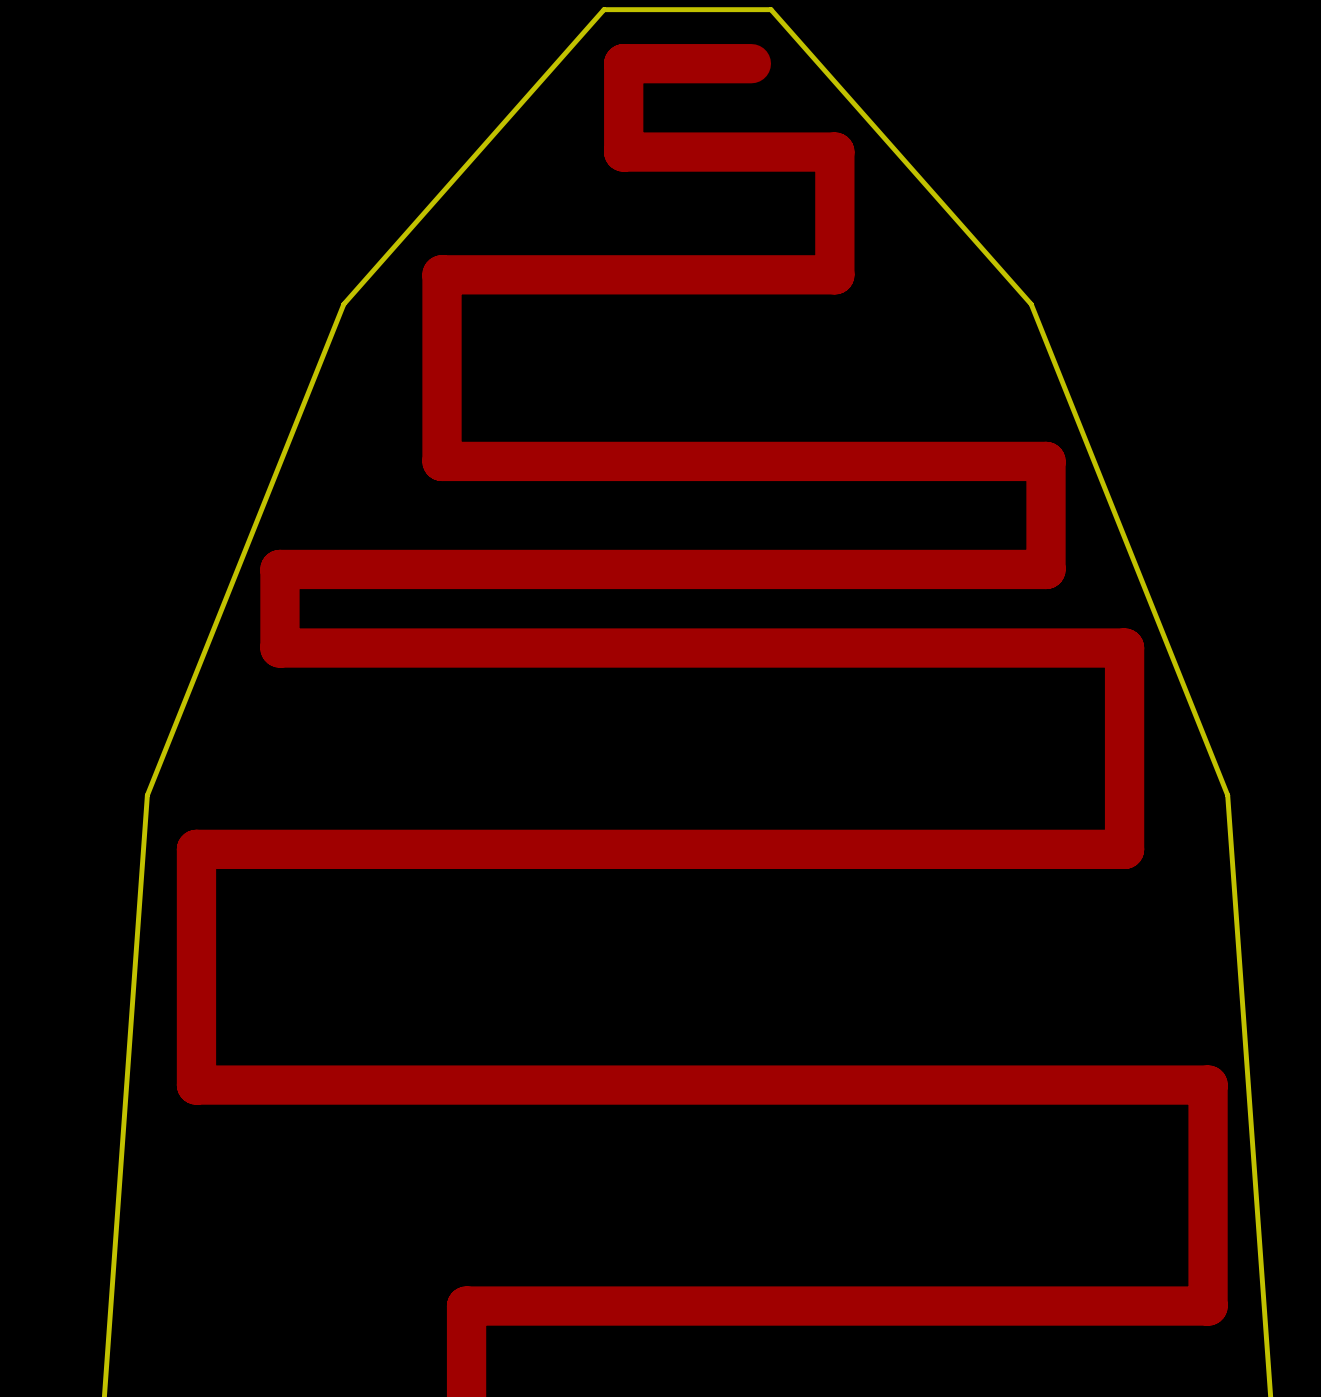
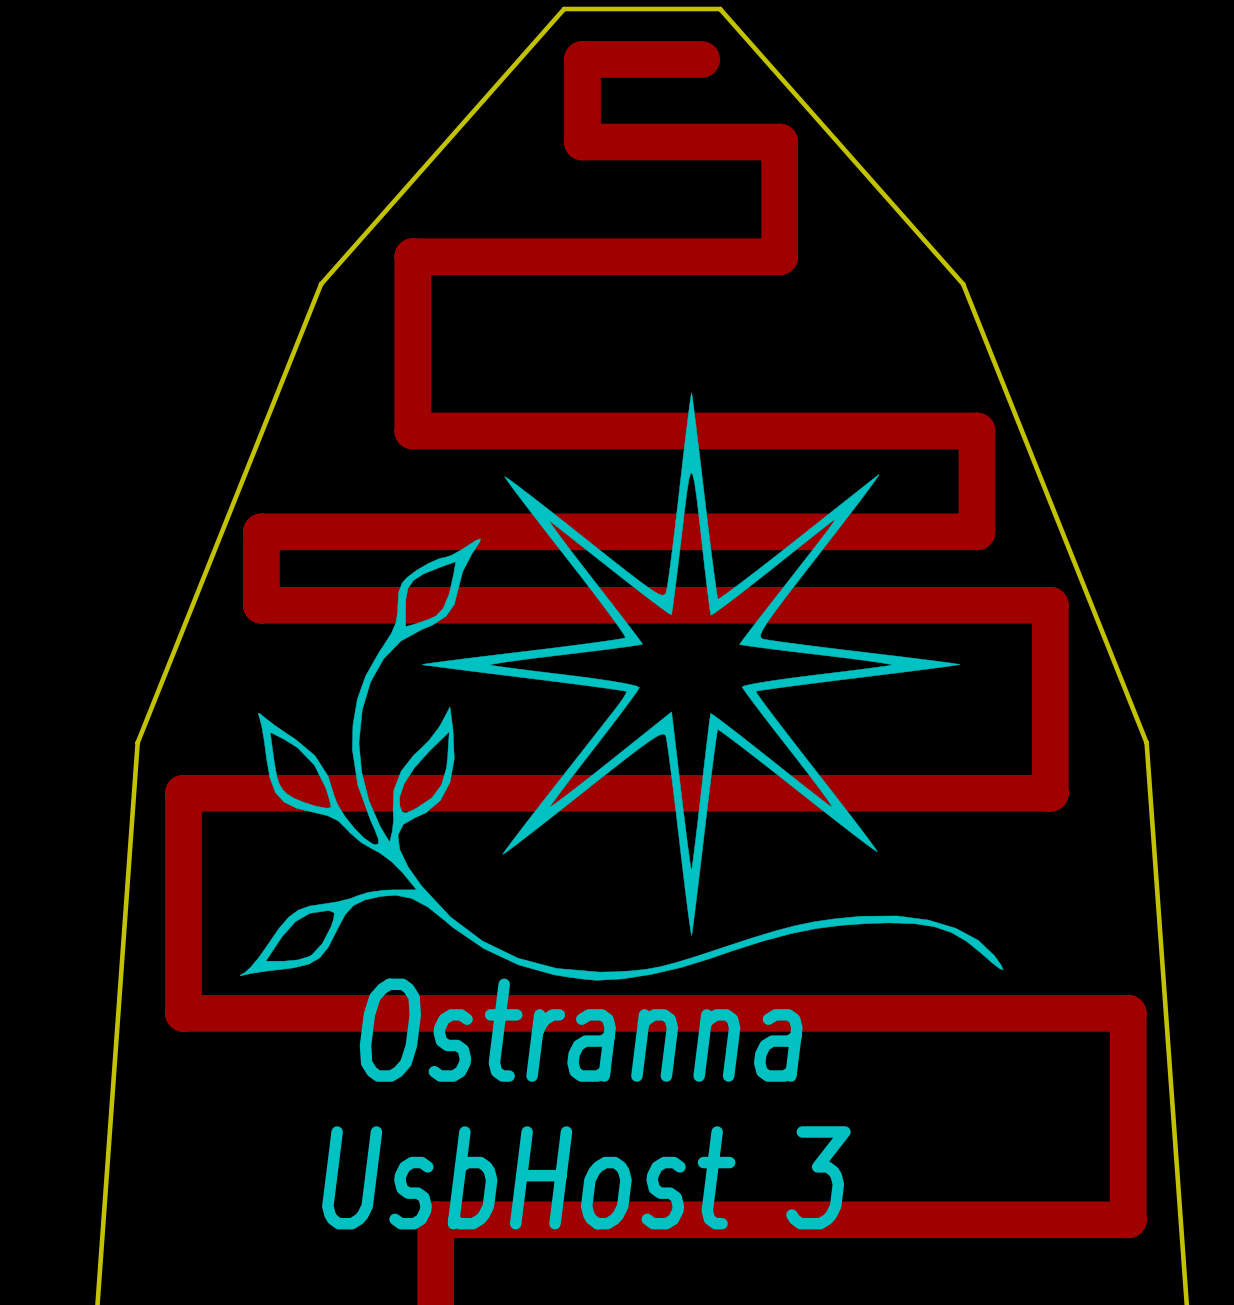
drawing: none -> [239, 392, 1004, 981]
text: none -> Ostranna (581, 1030)
text: none -> UsbHost 3 (586, 1177)

